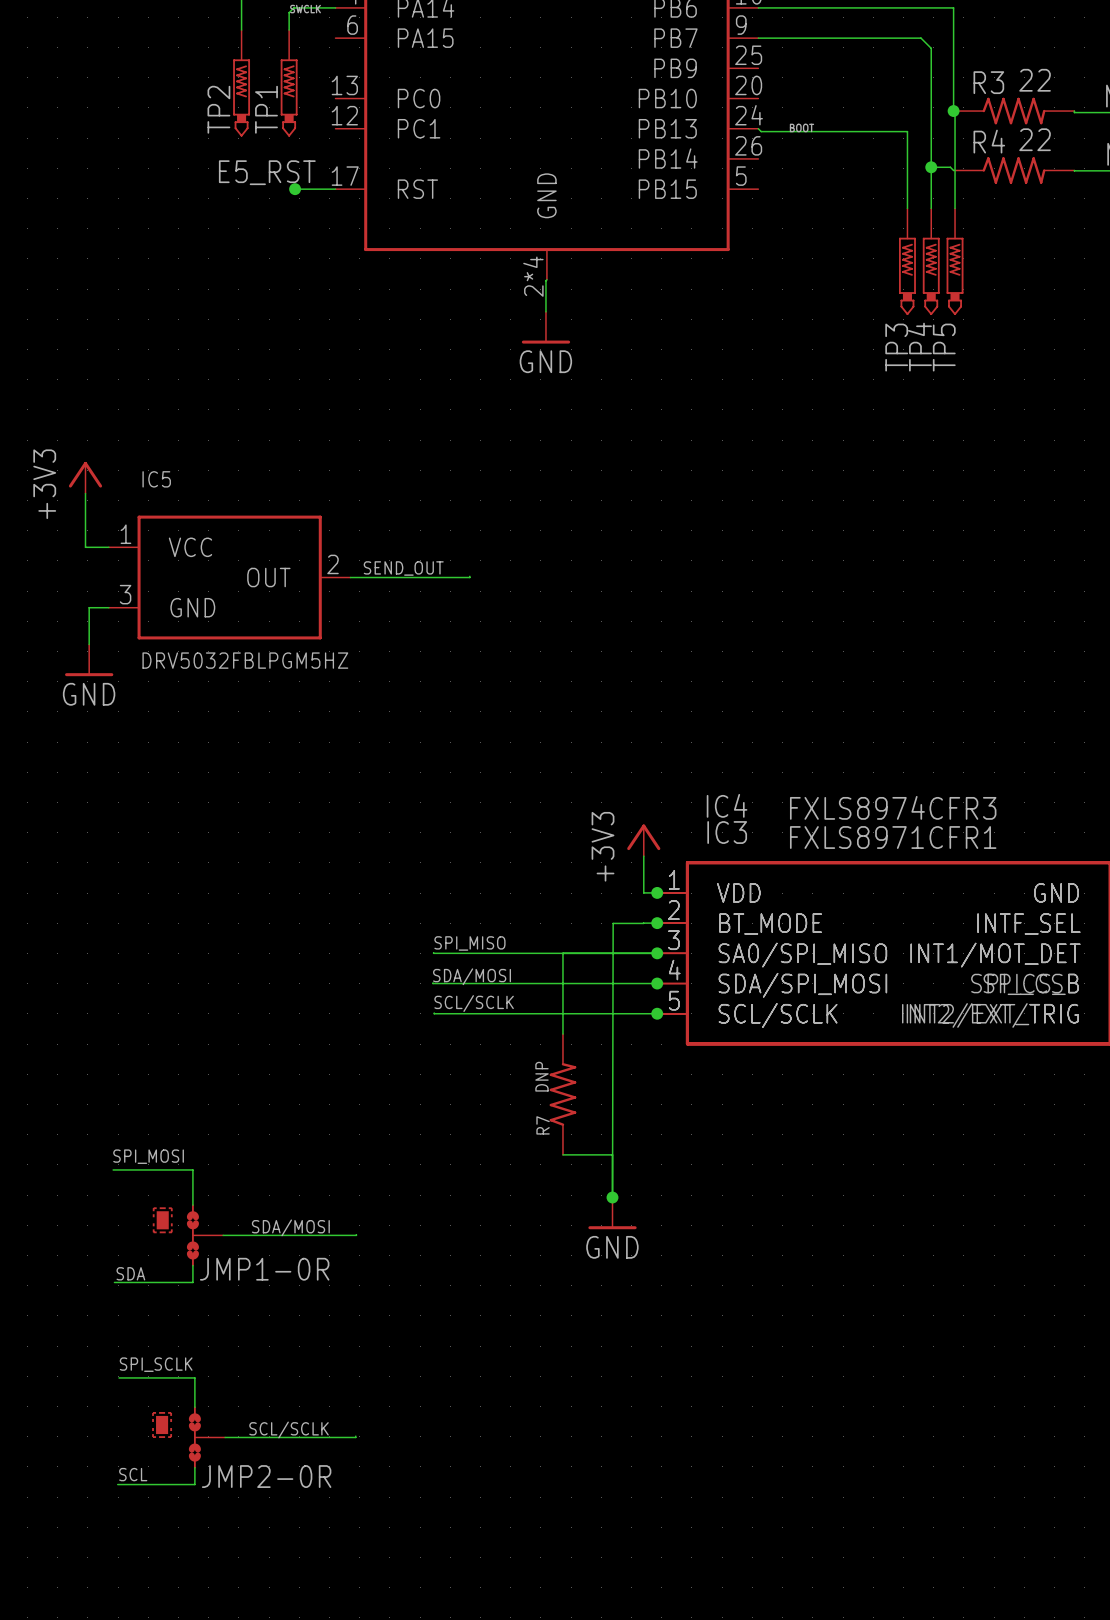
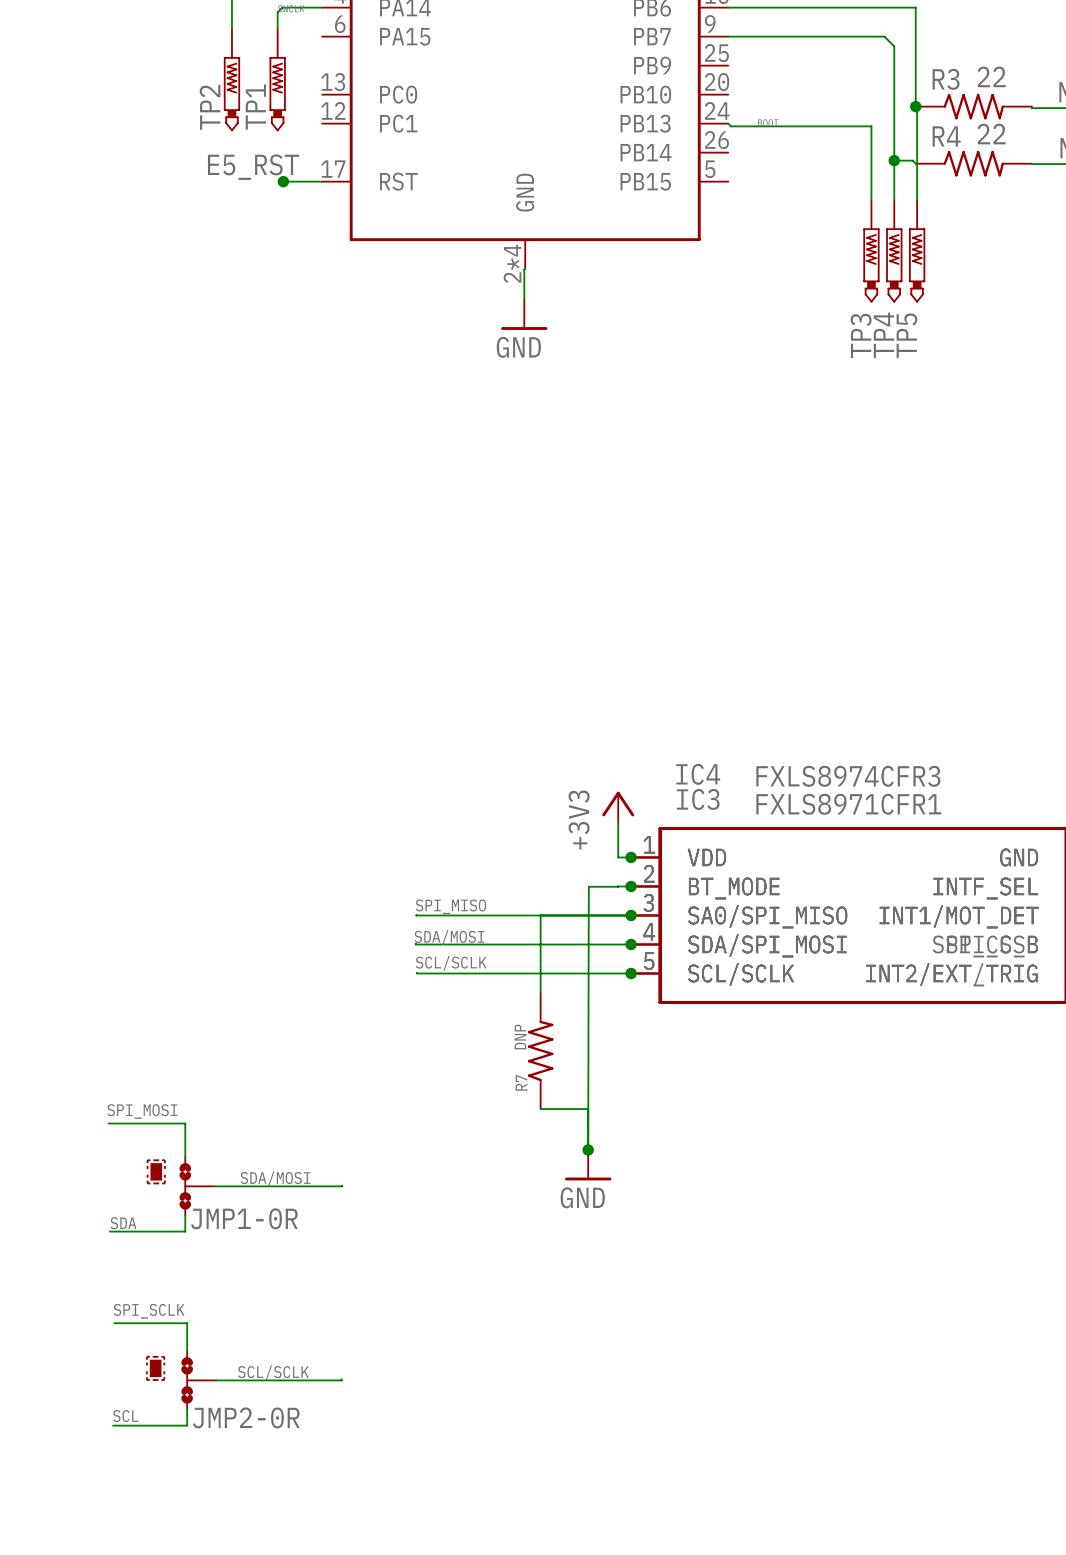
power symbol: +3V3 (85, 477) -> none
wire: (85, 493) (85, 547) (108, 547) -> none
label: SEND_OUT (403, 568) -> none
wire: (469, 576) (350, 577) -> none
IC5: DRV5032FBLPGM5HZ (229, 577) -> none
wire: (108, 607) (89, 607) (89, 644) -> none
power symbol: GND (89, 660) -> none

